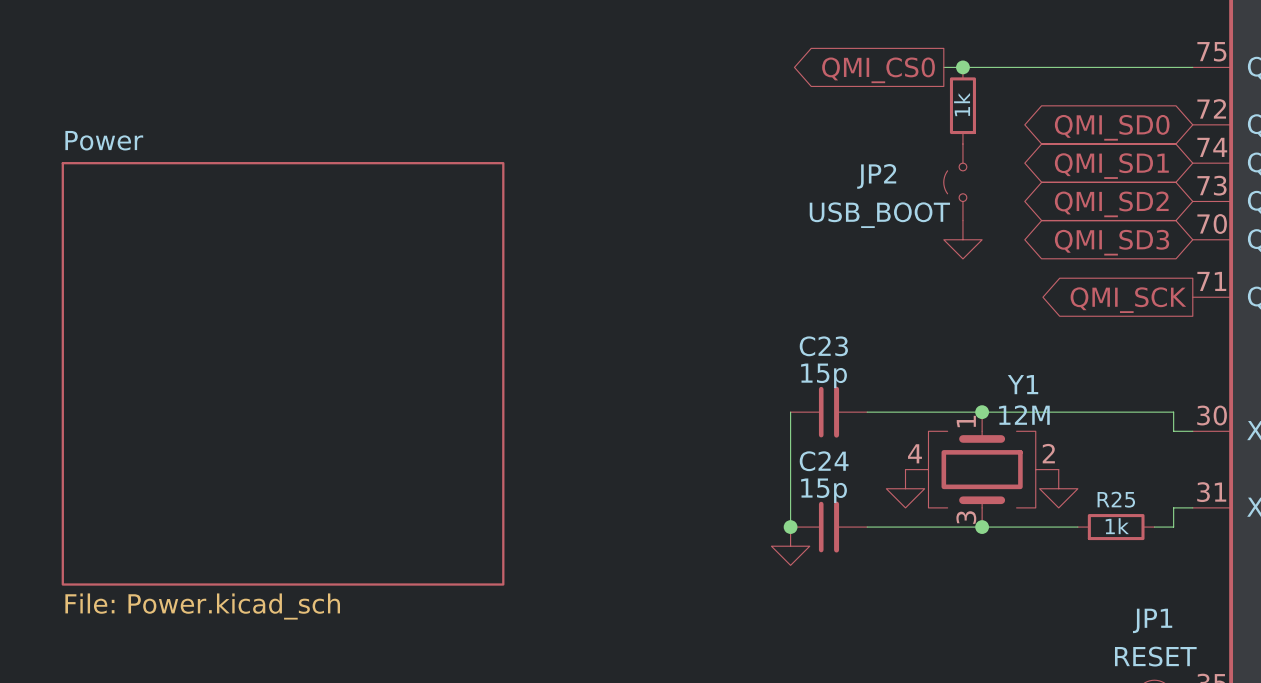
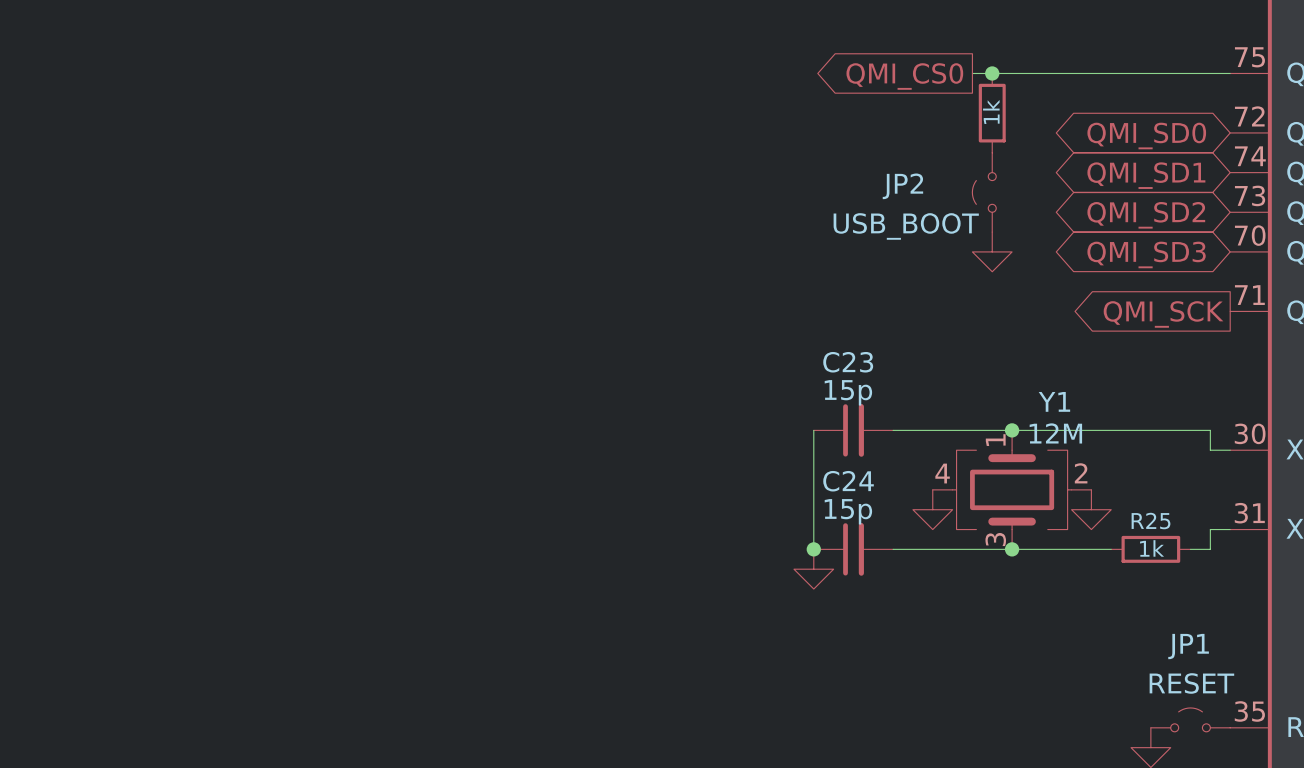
sheet Power: File: Power.kicad_sch (283, 373) -> none

